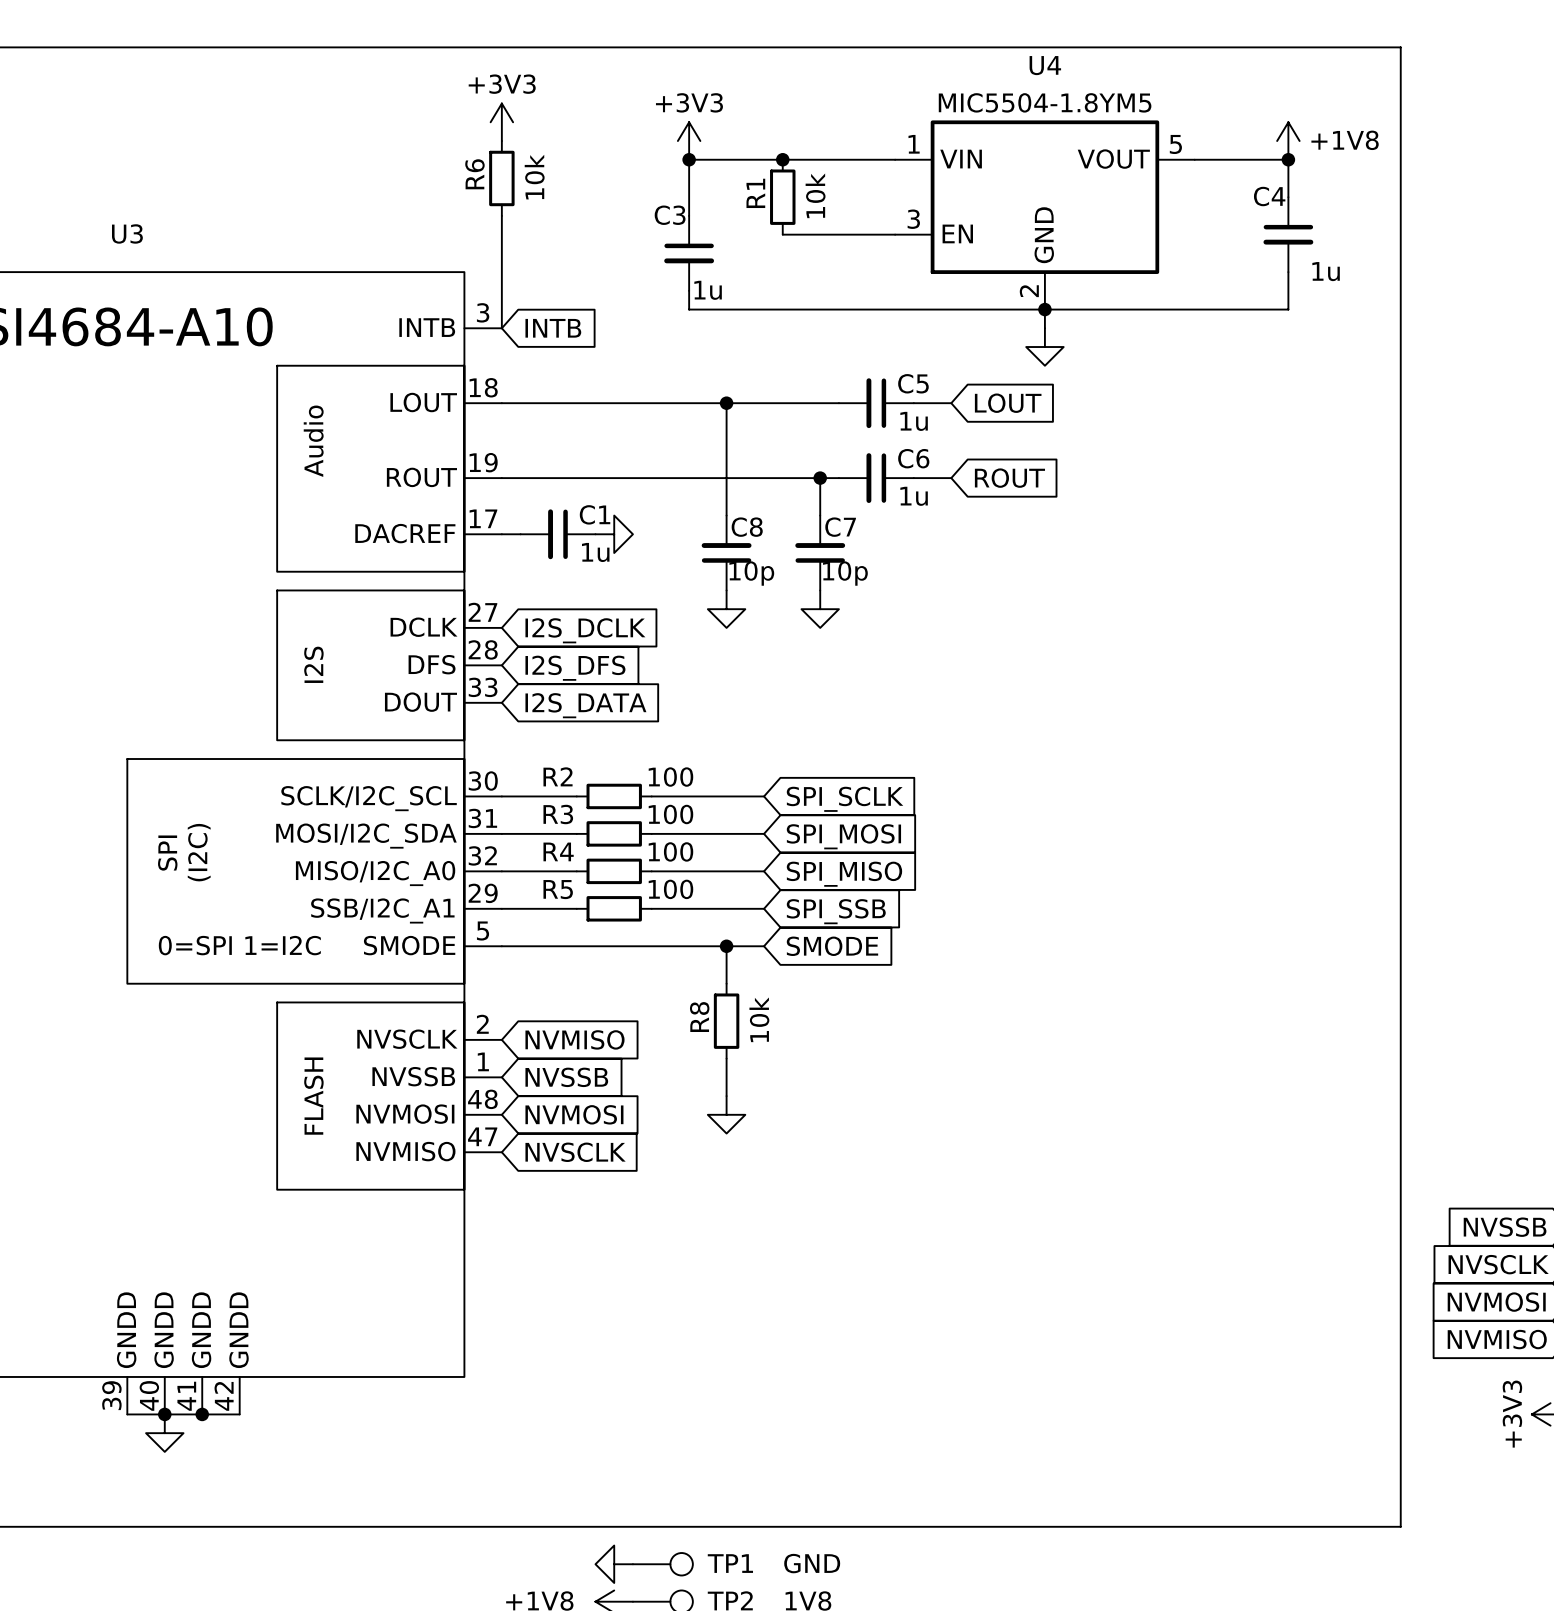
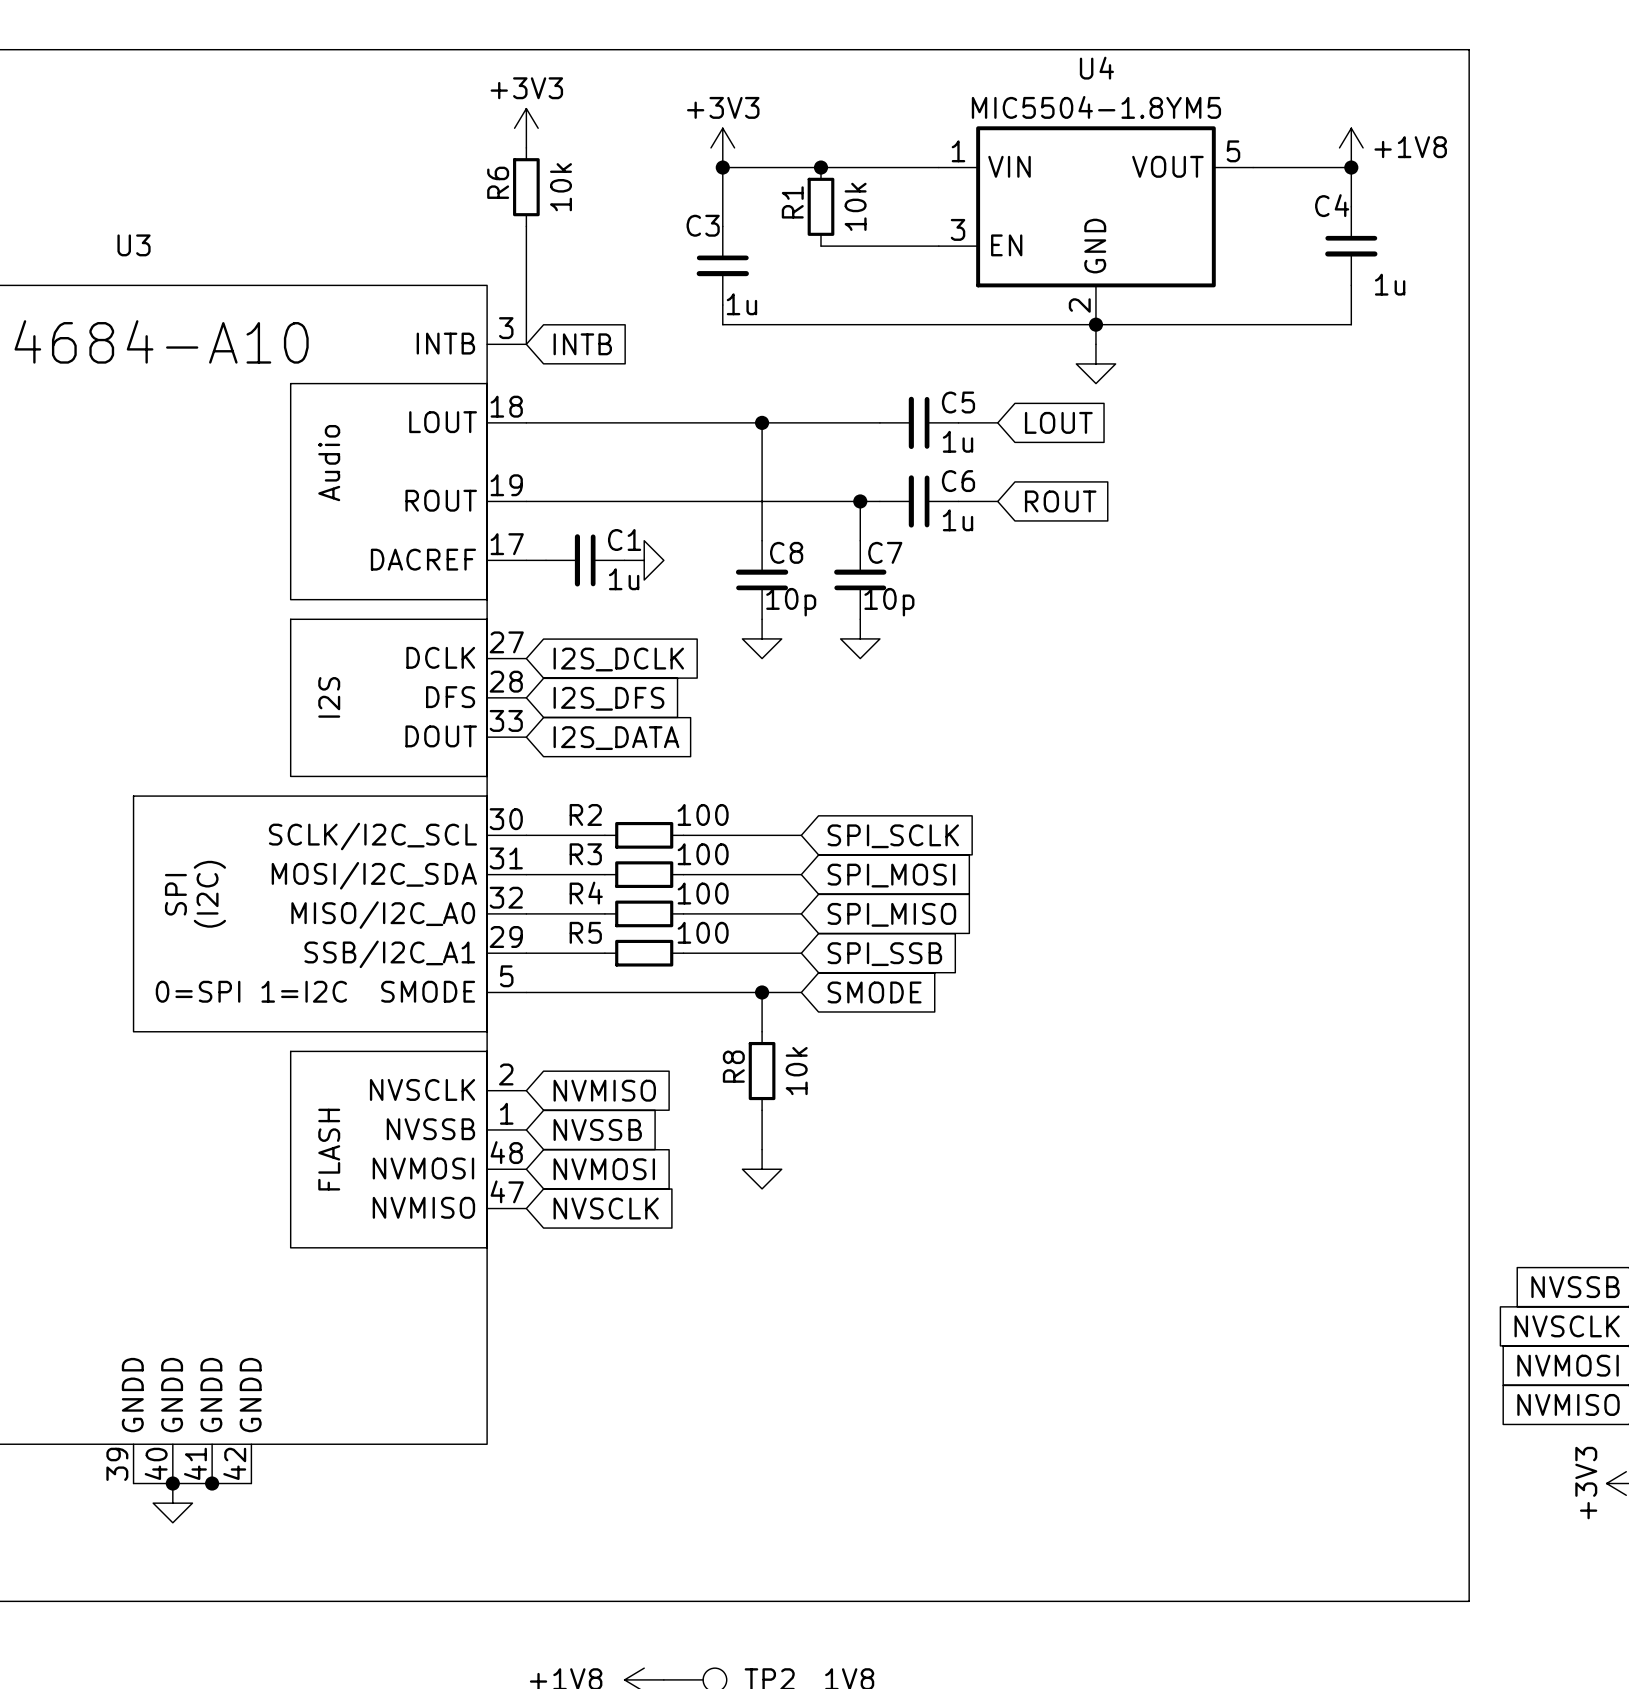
power symbol: (614, 1564) -> none
TP1: GND (662, 1564) -> none

